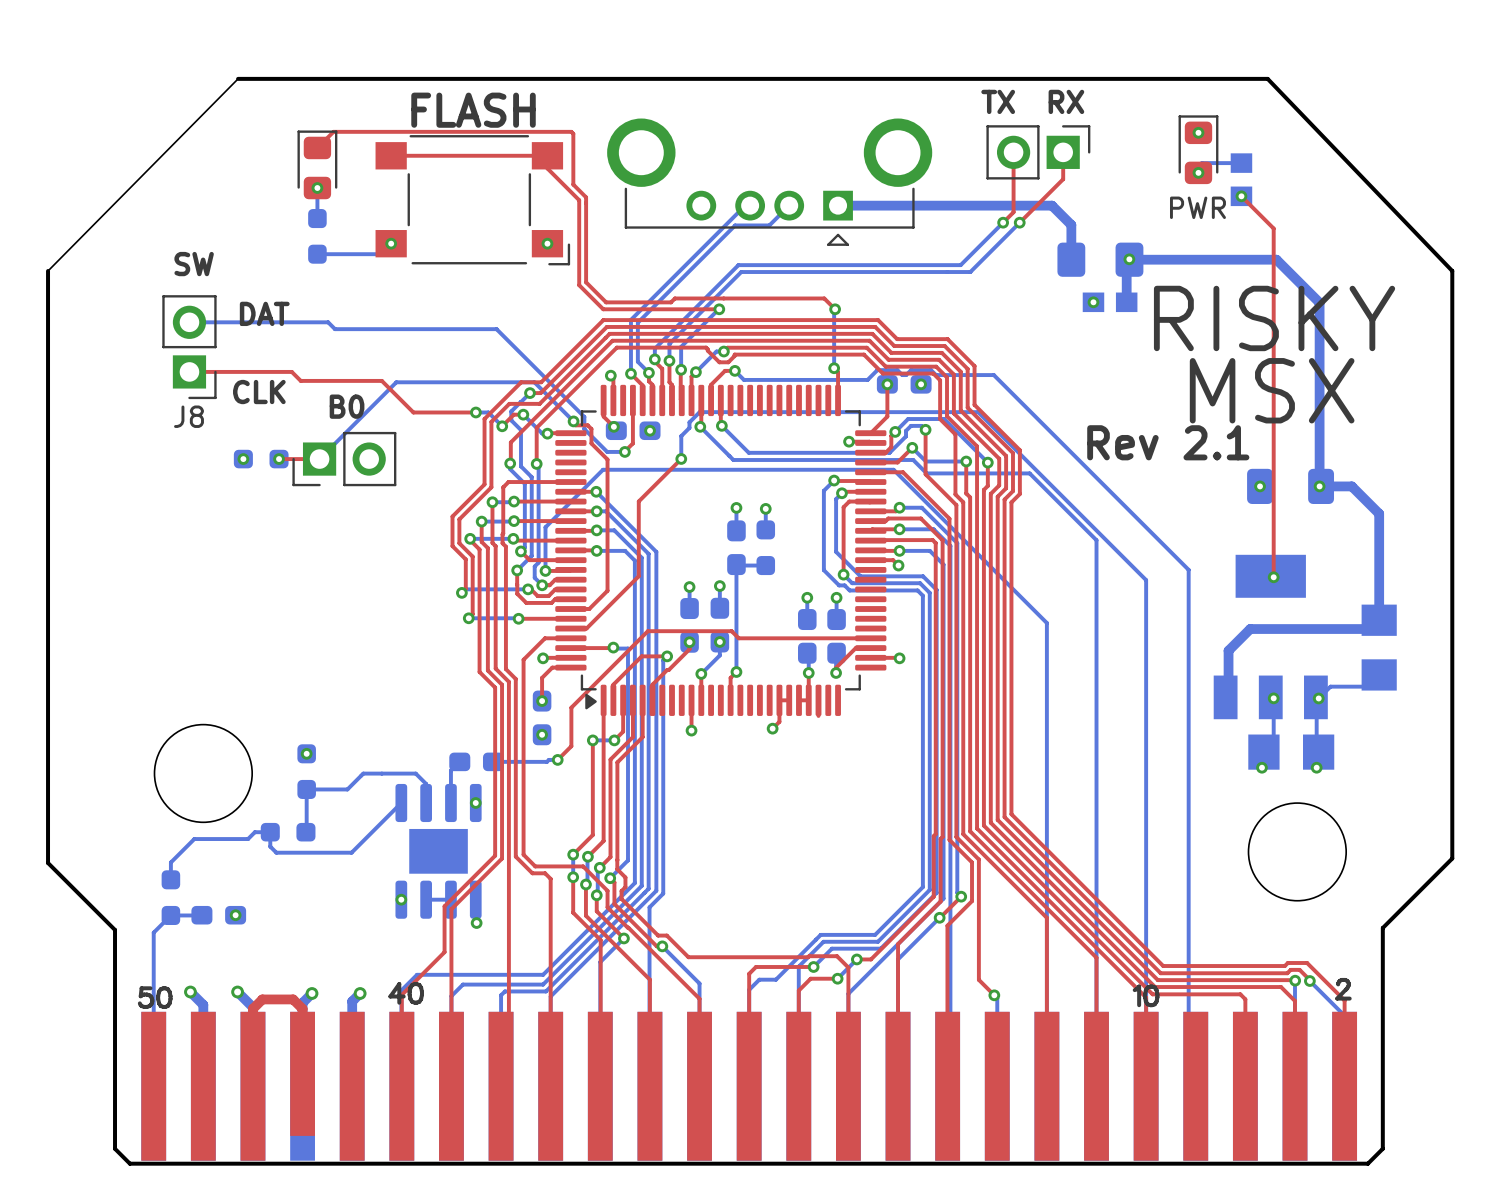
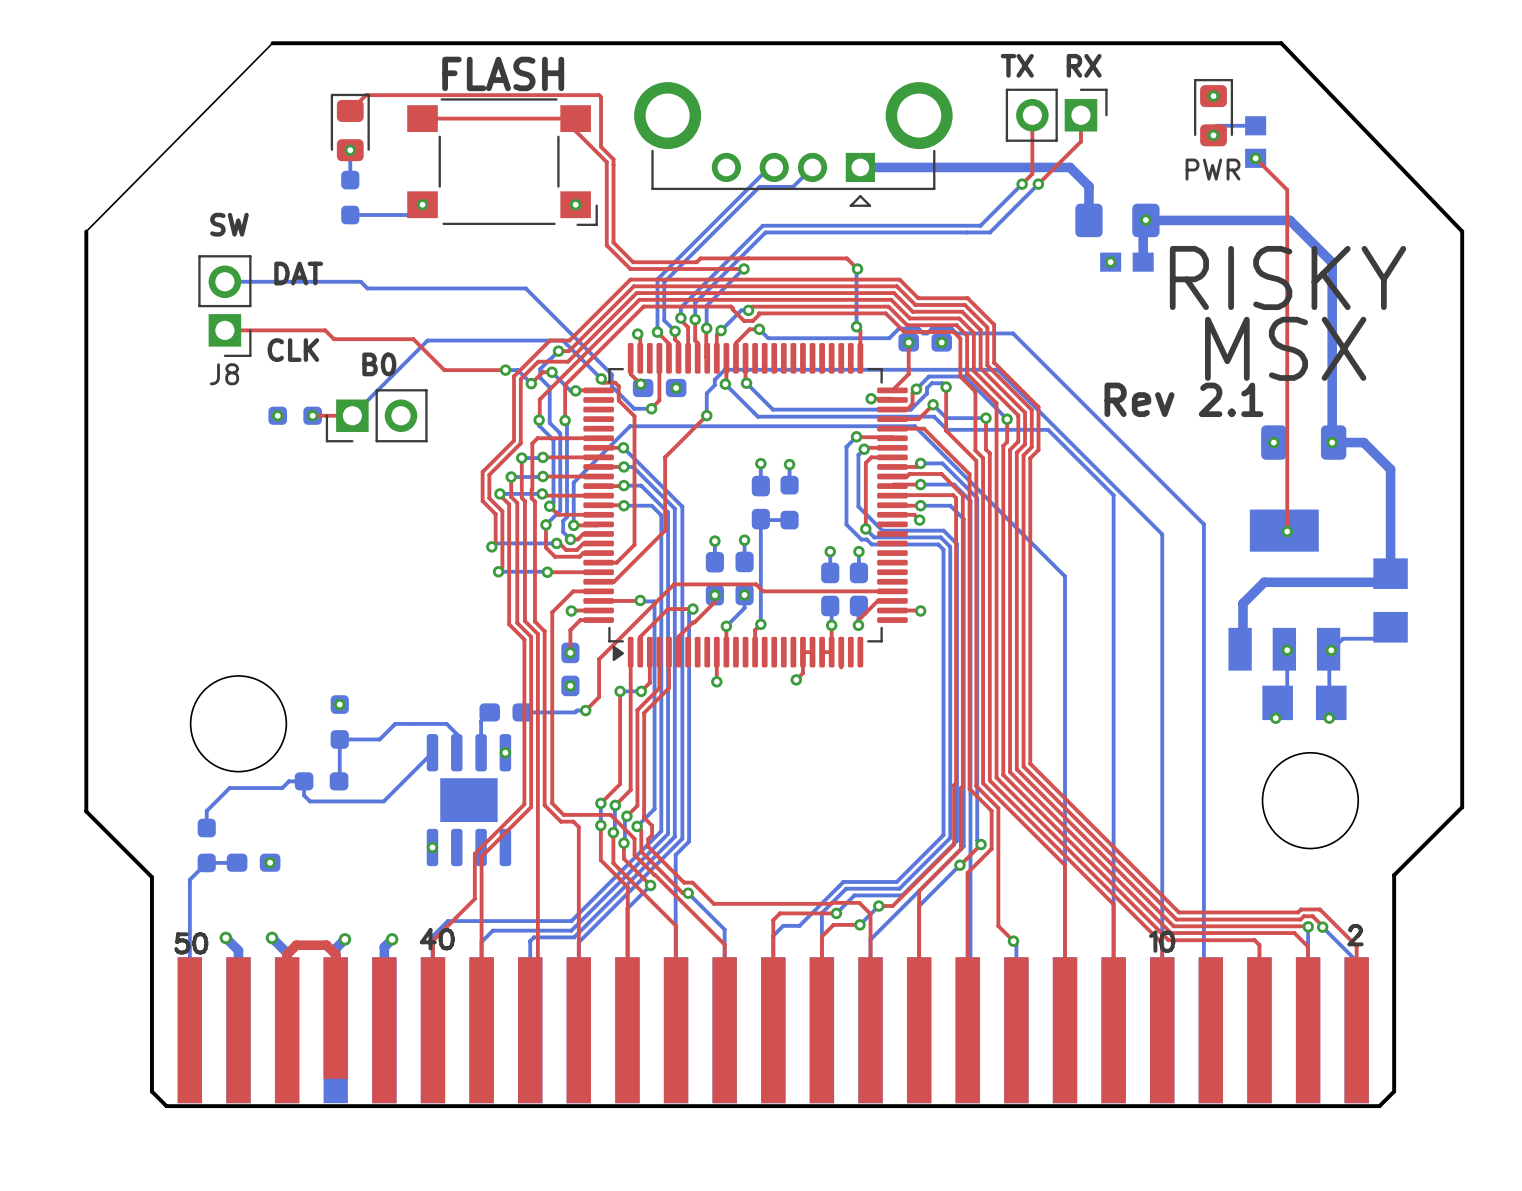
bottom track: (426, 899) (450, 899) -> none
via: (476, 923) -> none

